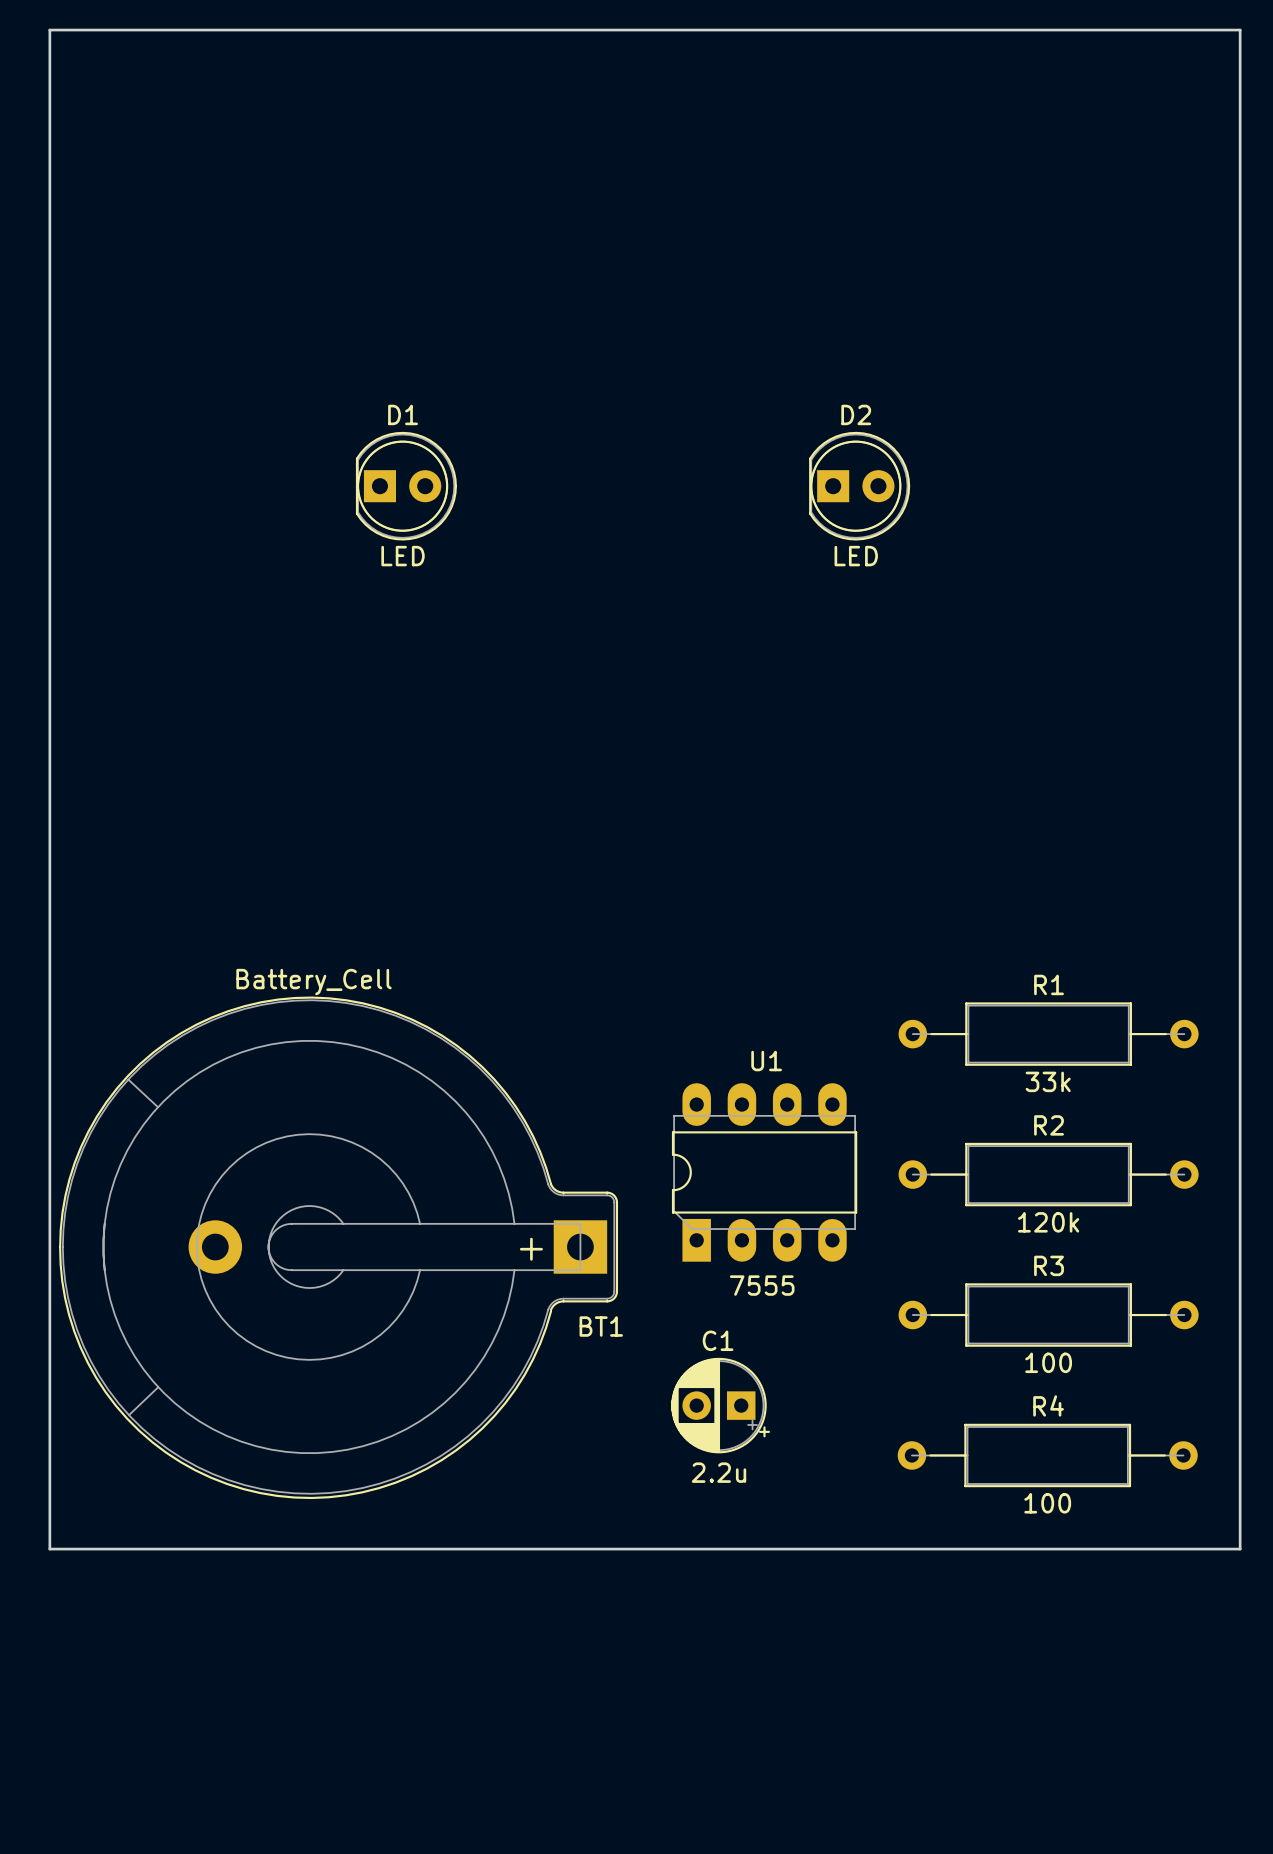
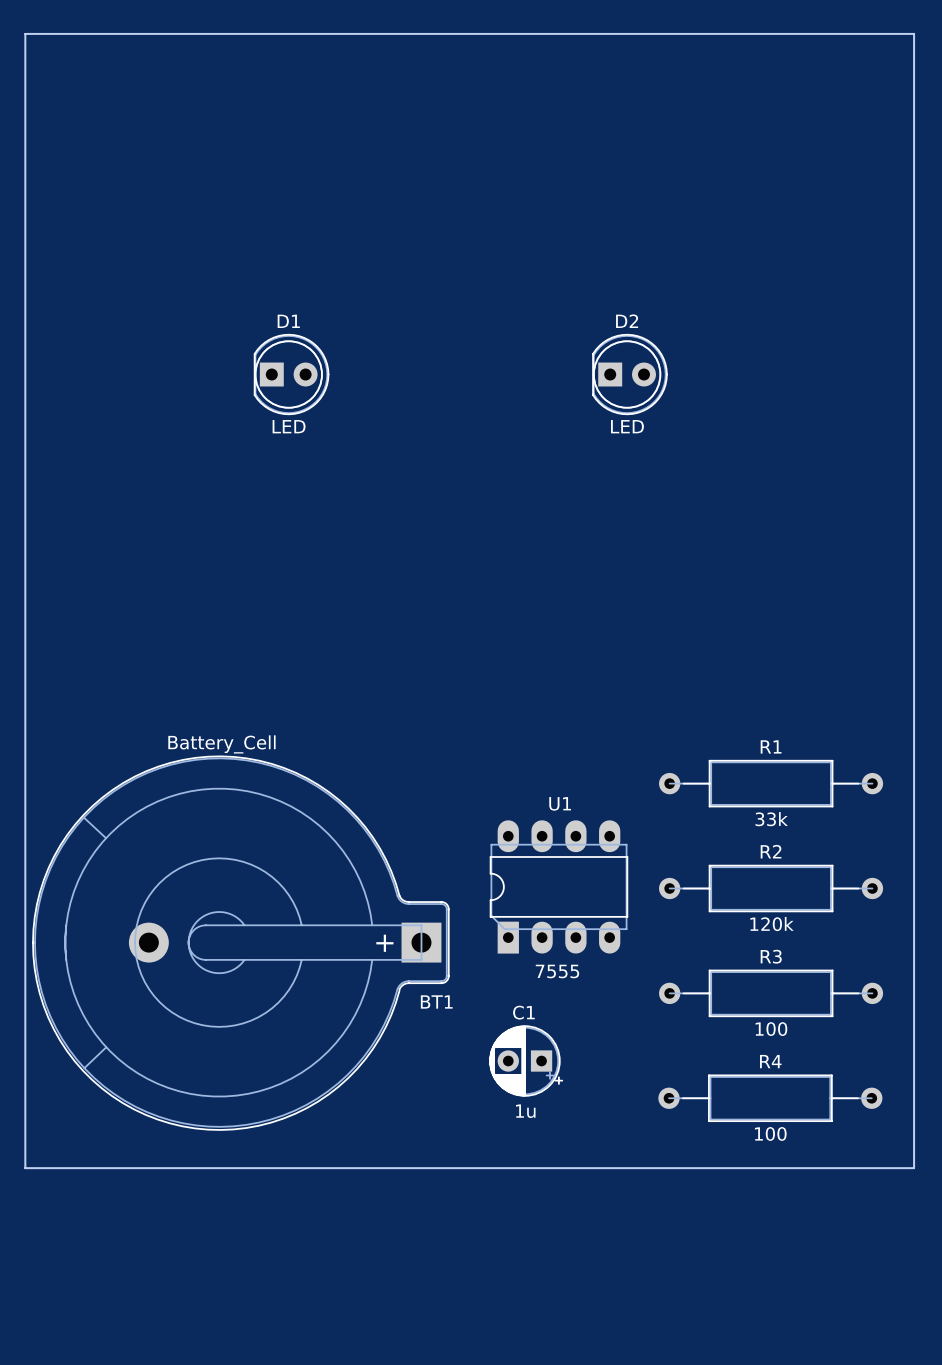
C1 value: 2.2u (719, 1472) -> 1u (525, 1111)

